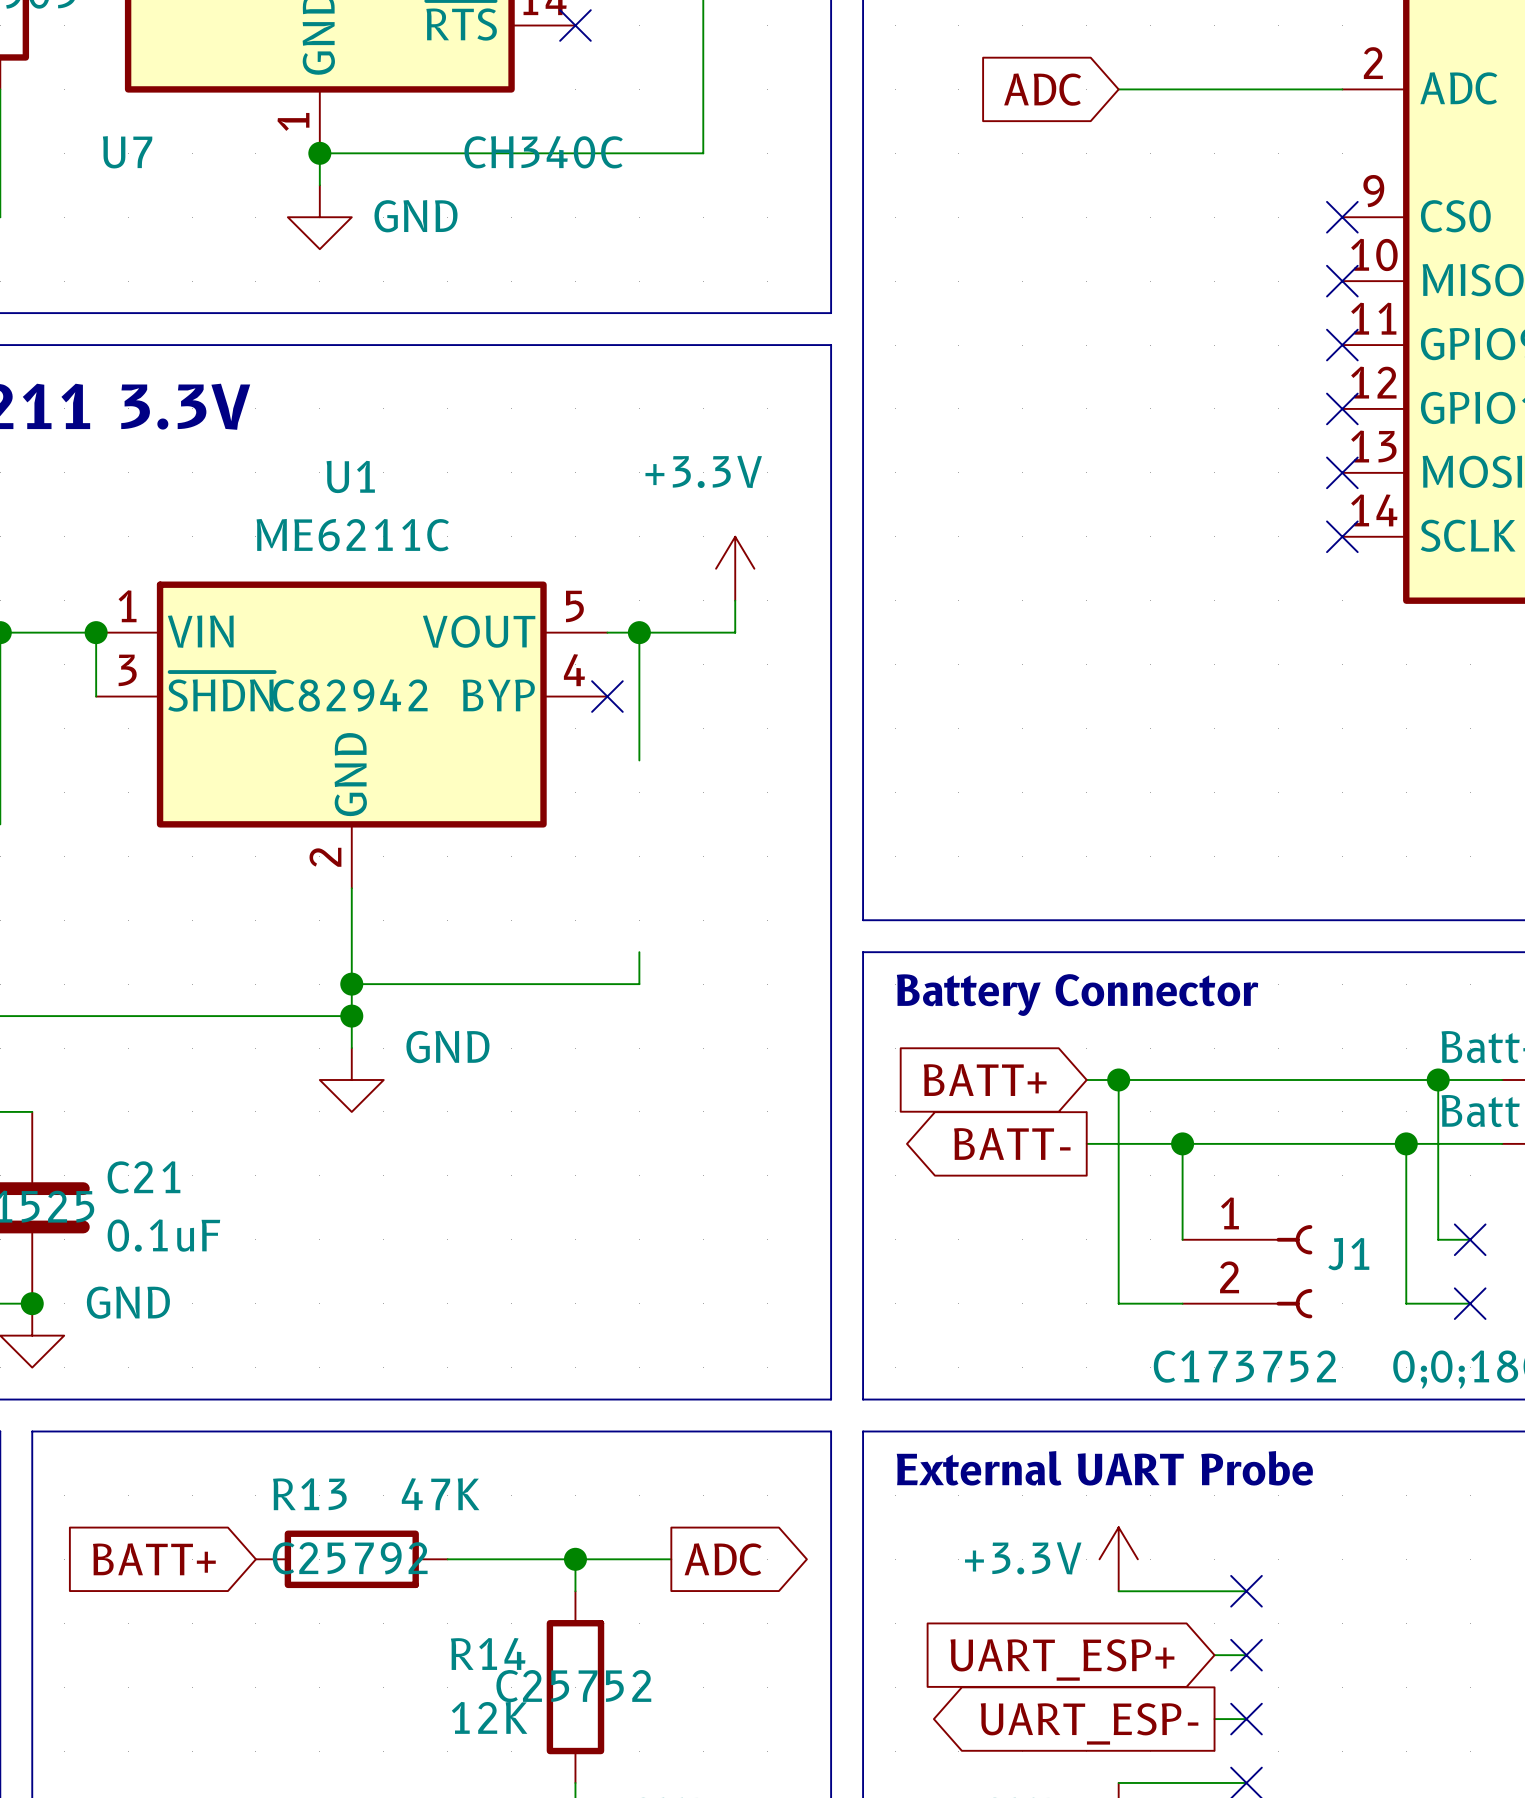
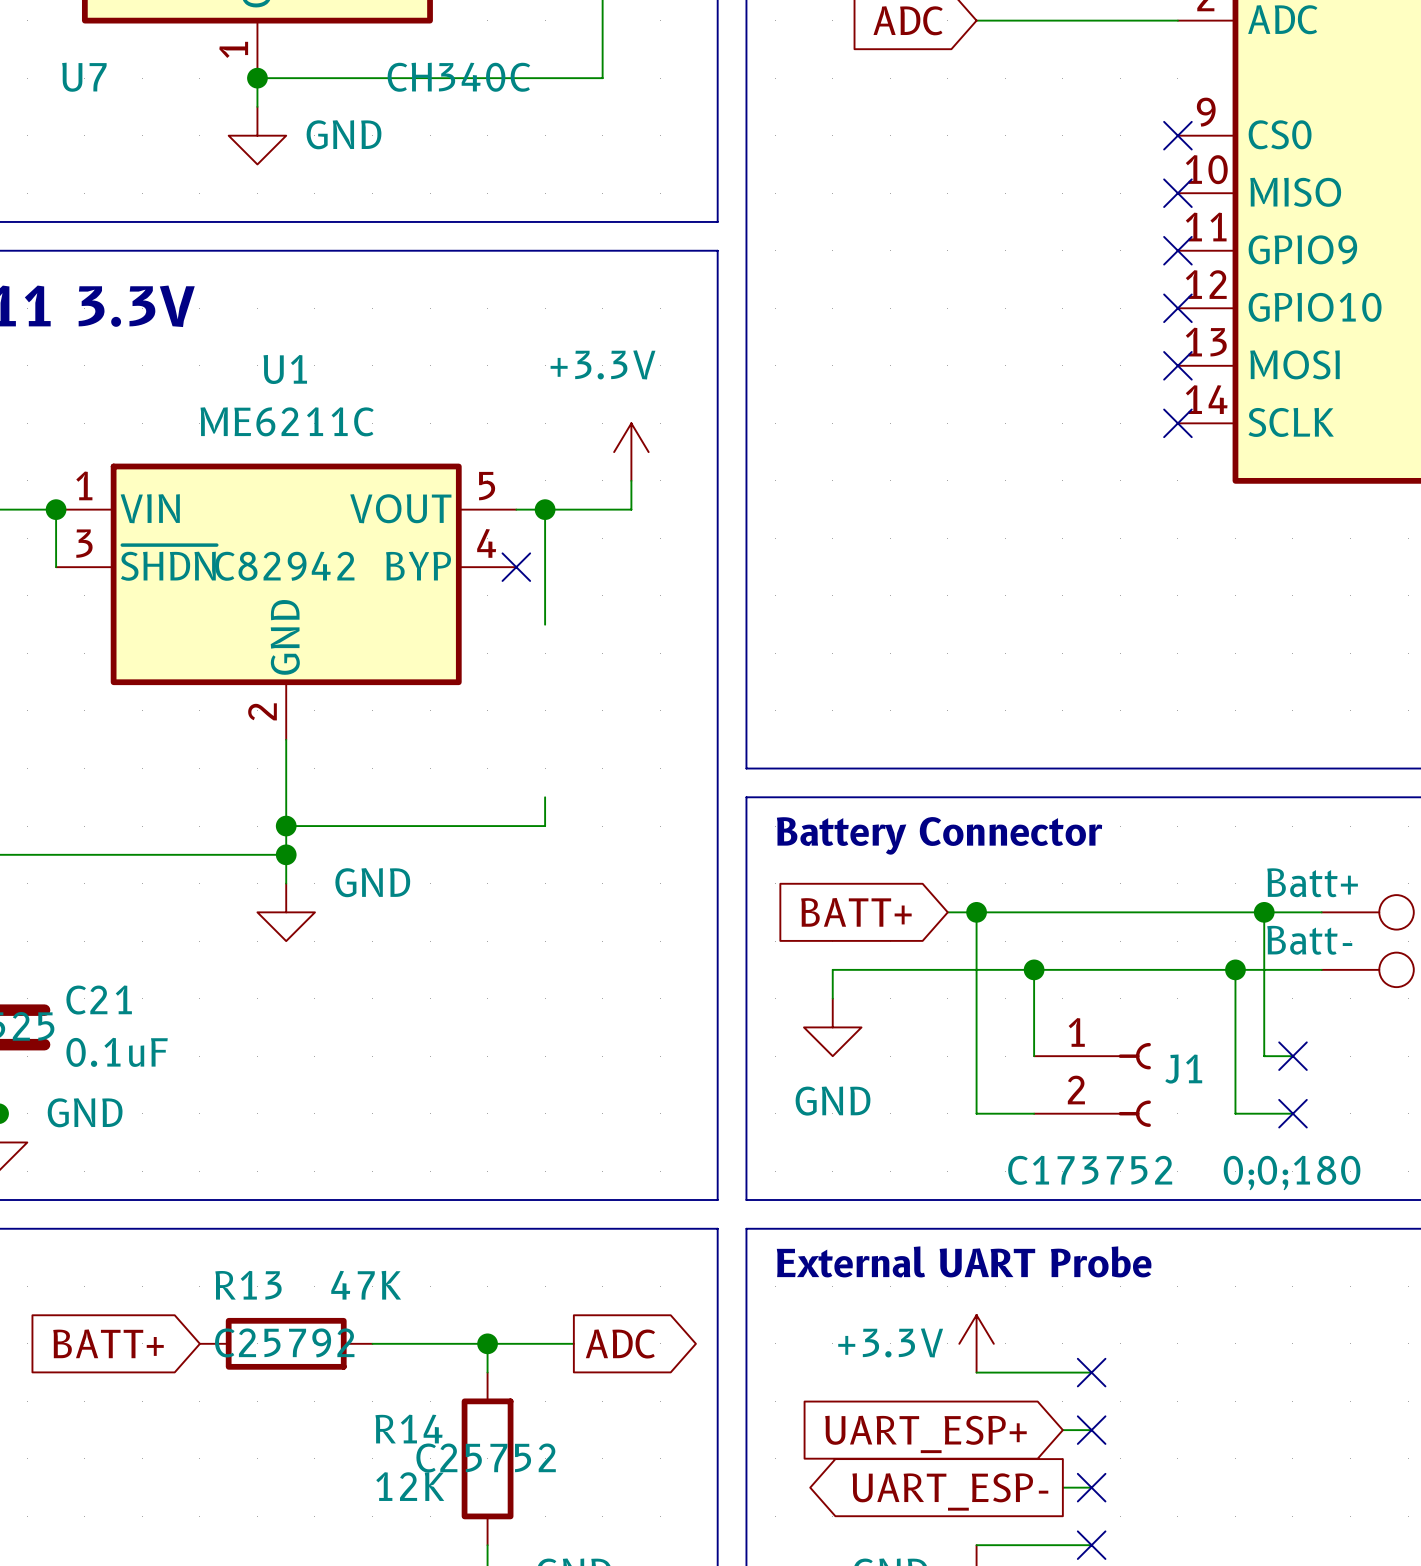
global label: BATT- (1012, 1143) -> none
wire: none -> (947, 969) (832, 969) (832, 998)
power symbol: none -> GND (832, 1027)

